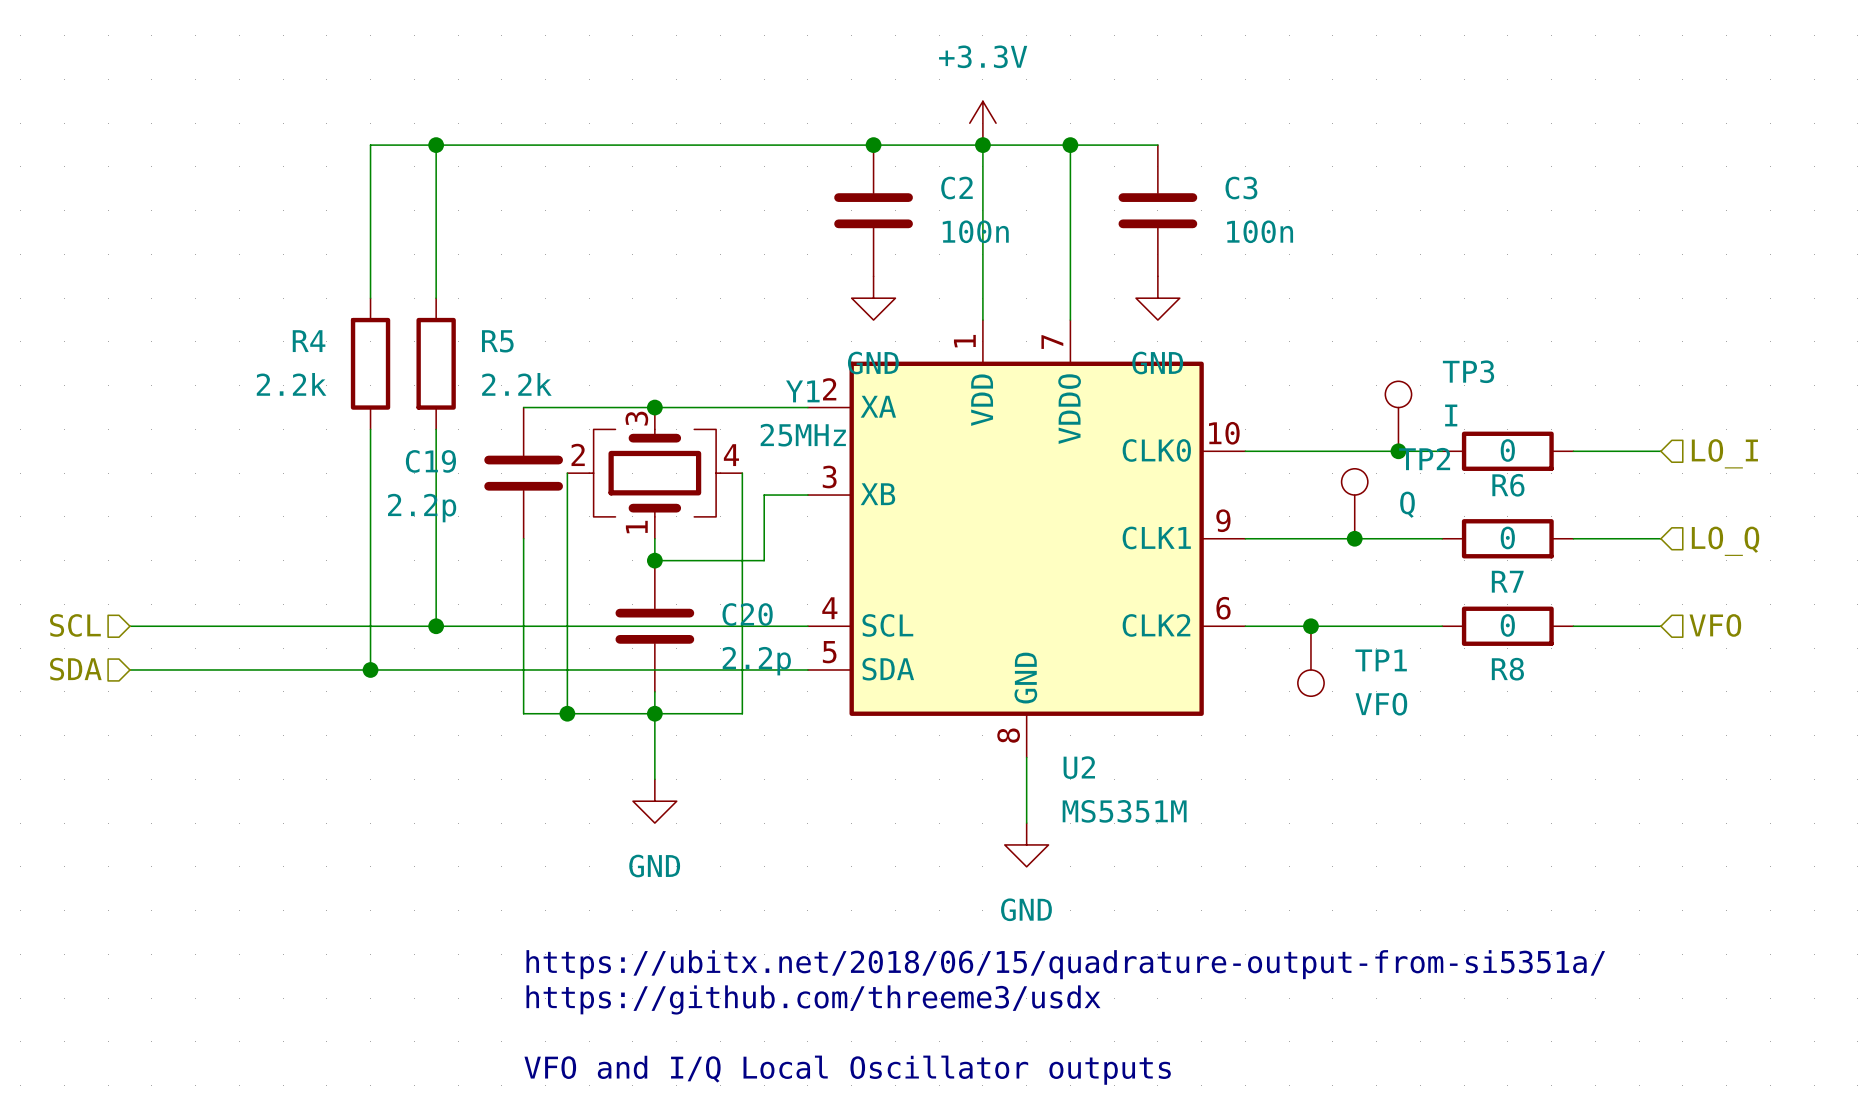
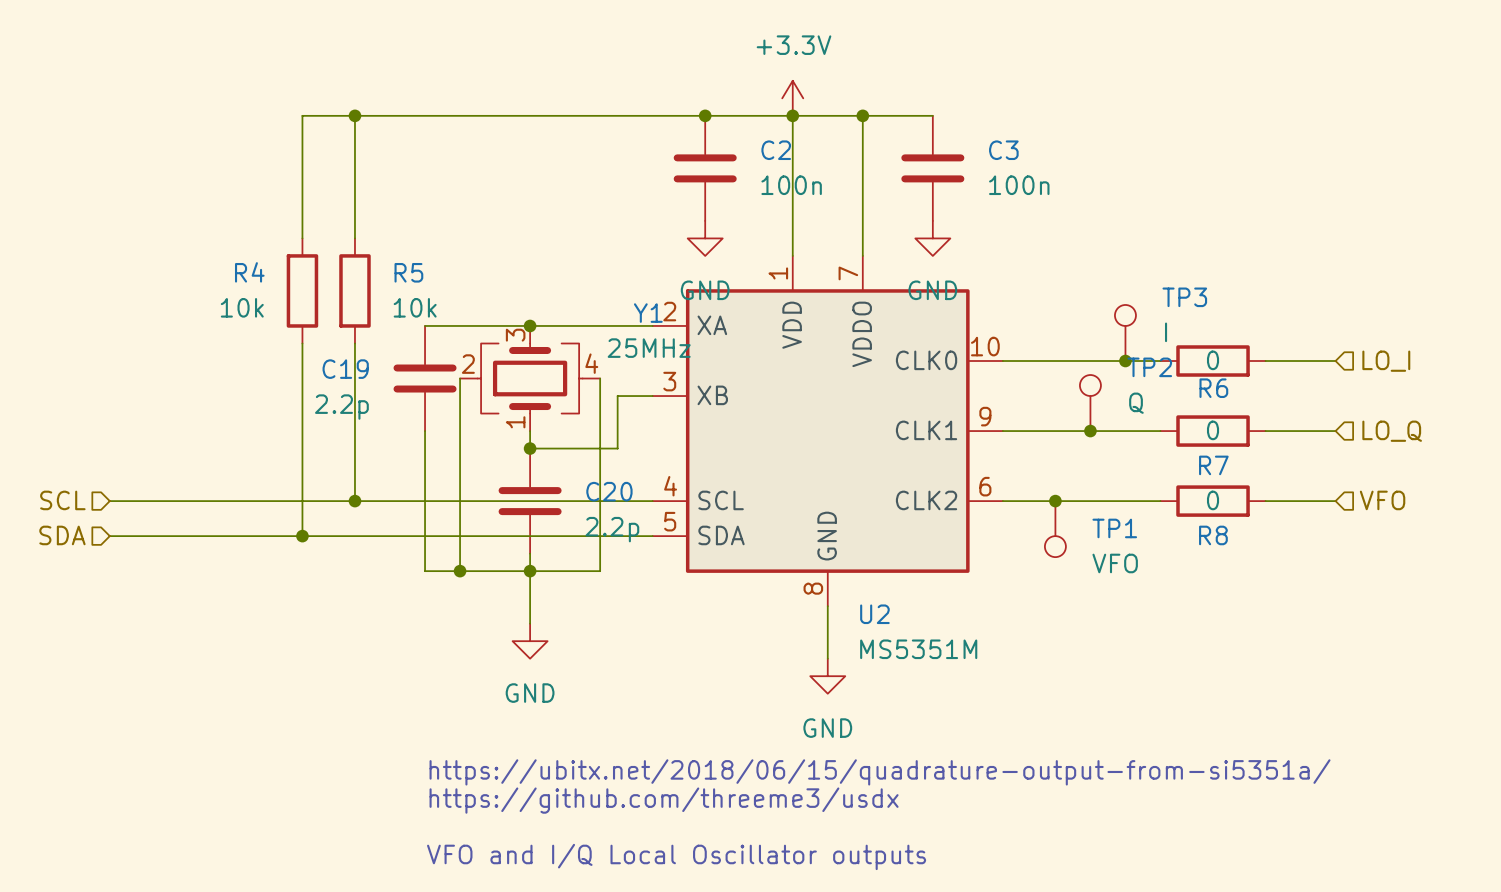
R4 value: 2.2k (291, 384) -> 10k (242, 307)
R5 value: 2.2k (516, 384) -> 10k (415, 307)

